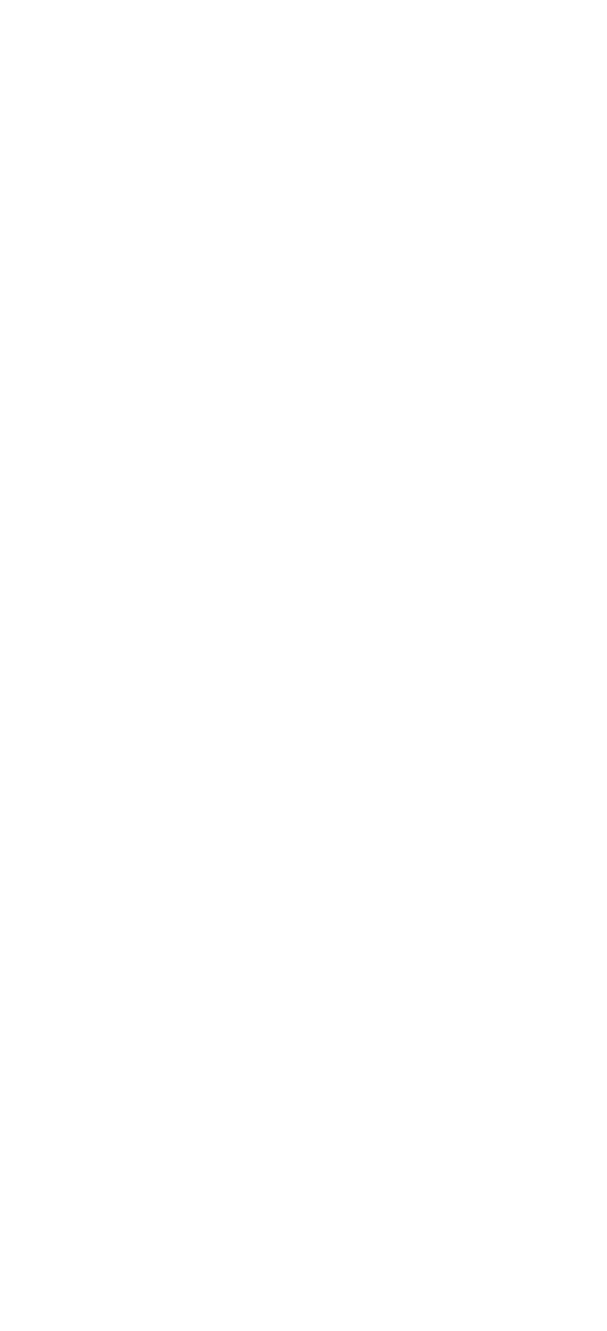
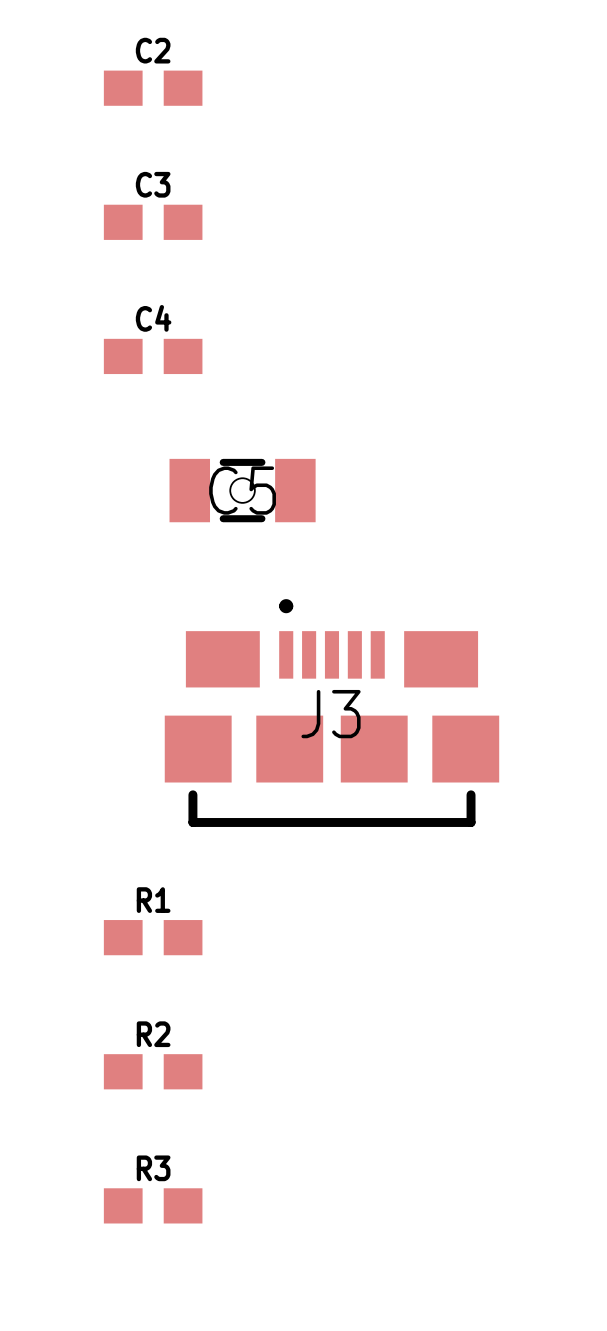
C2: none -> (153, 88)
C3: none -> (153, 222)
C4: none -> (153, 356)
C5: none -> (242, 490)
J3: none -> (331, 713)
R1: none -> (153, 937)
R2: none -> (153, 1071)
R3: none -> (153, 1205)

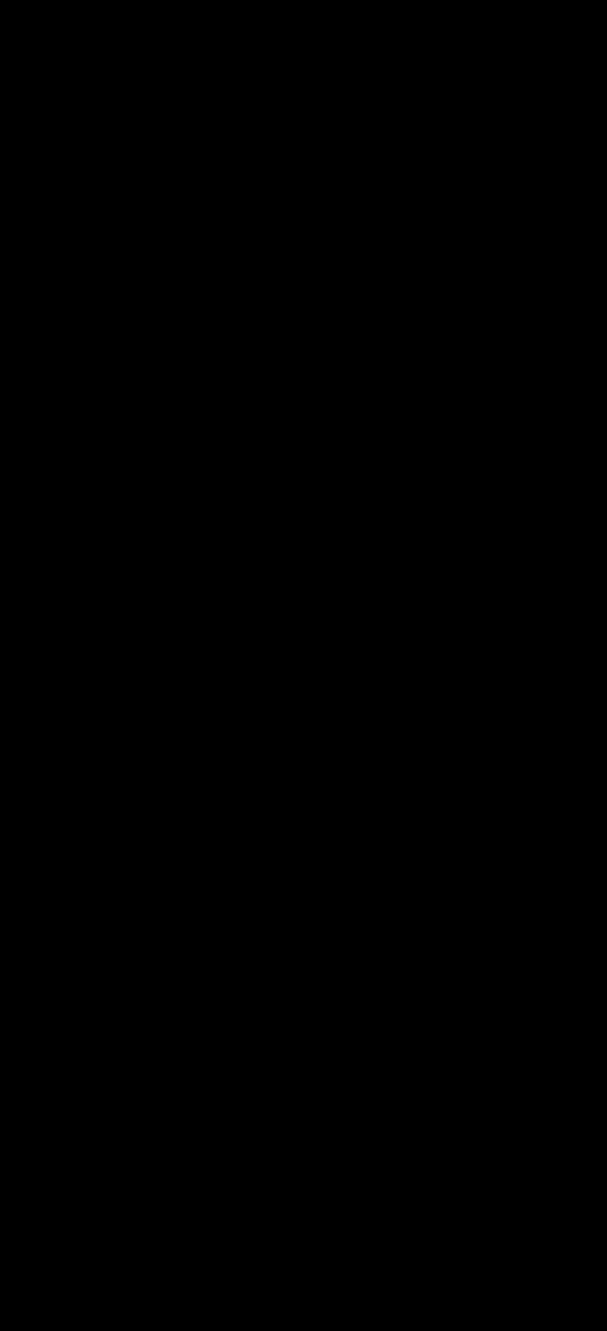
C2: (153, 88) -> none
C3: (153, 222) -> none
C4: (153, 356) -> none
C5: (242, 490) -> none
J3: (331, 713) -> none
R1: (153, 937) -> none
R2: (153, 1071) -> none
R3: (153, 1205) -> none

